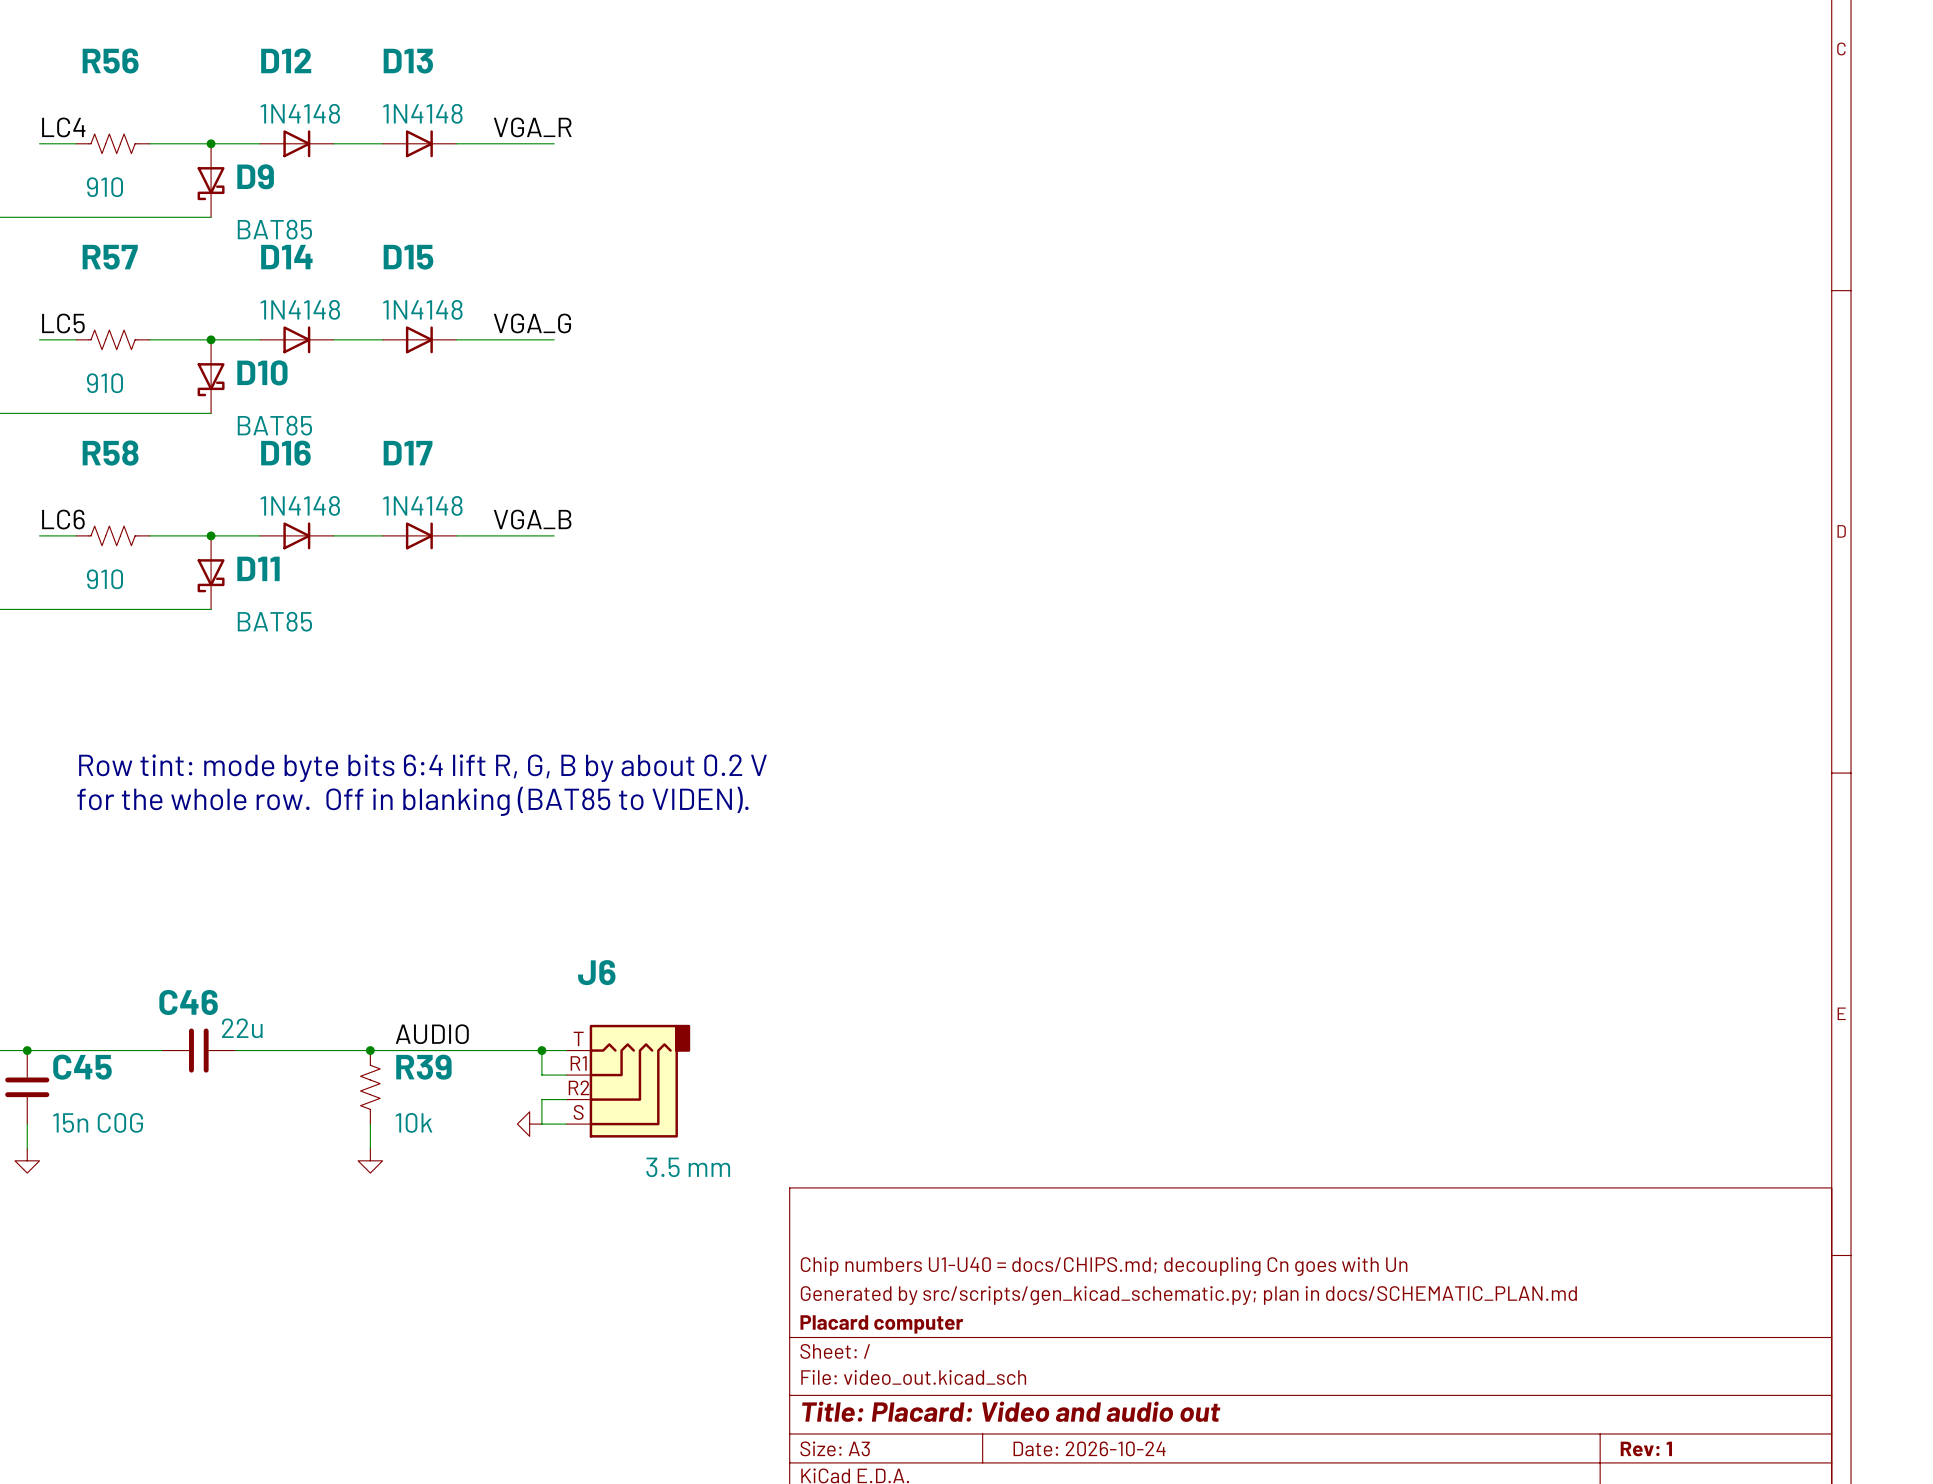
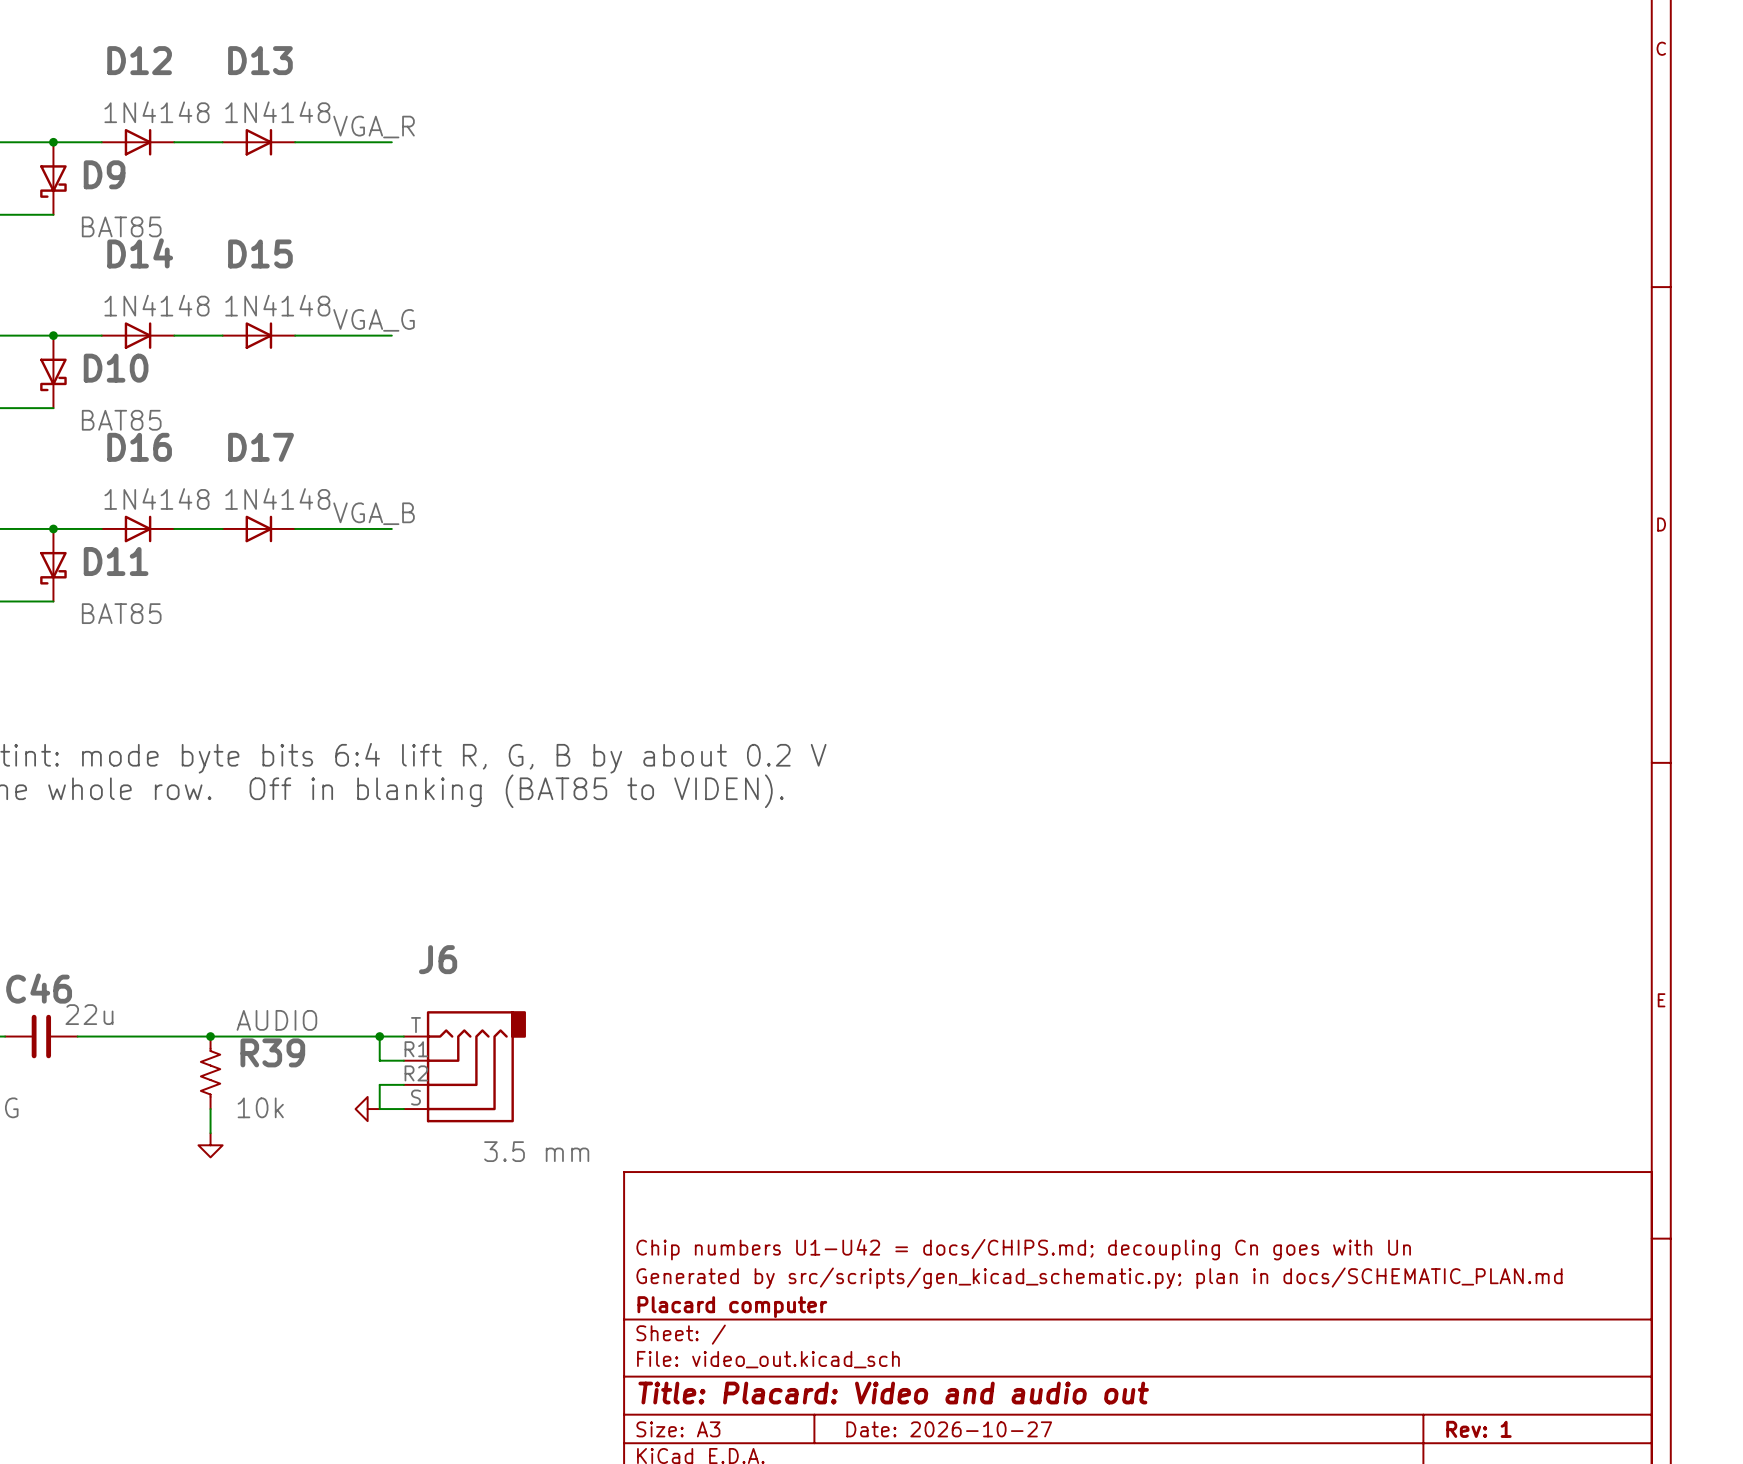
title block: Chip numbers U1-U40 = docs/CHIPS.md; decoupling Cn goes with Un (1104, 1266) -> Chip numbers U1-U42 = docs/CHIPS.md; decoupling Cn goes with Un (1023, 1249)
title block: Date: 2026-10-24 (1089, 1448) -> Date: 2026-10-27 (949, 1429)

